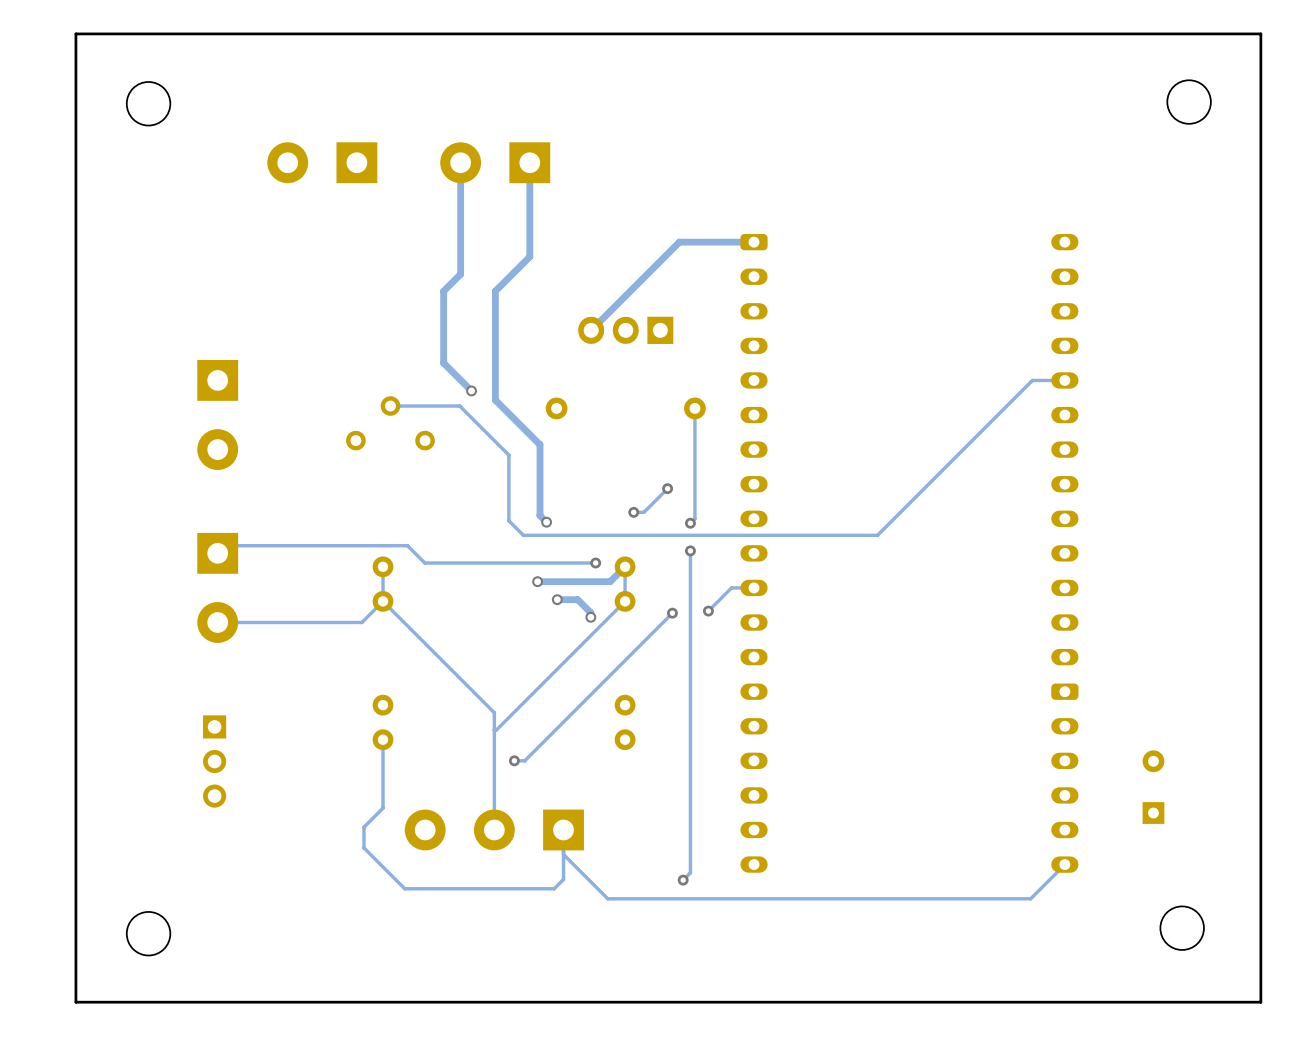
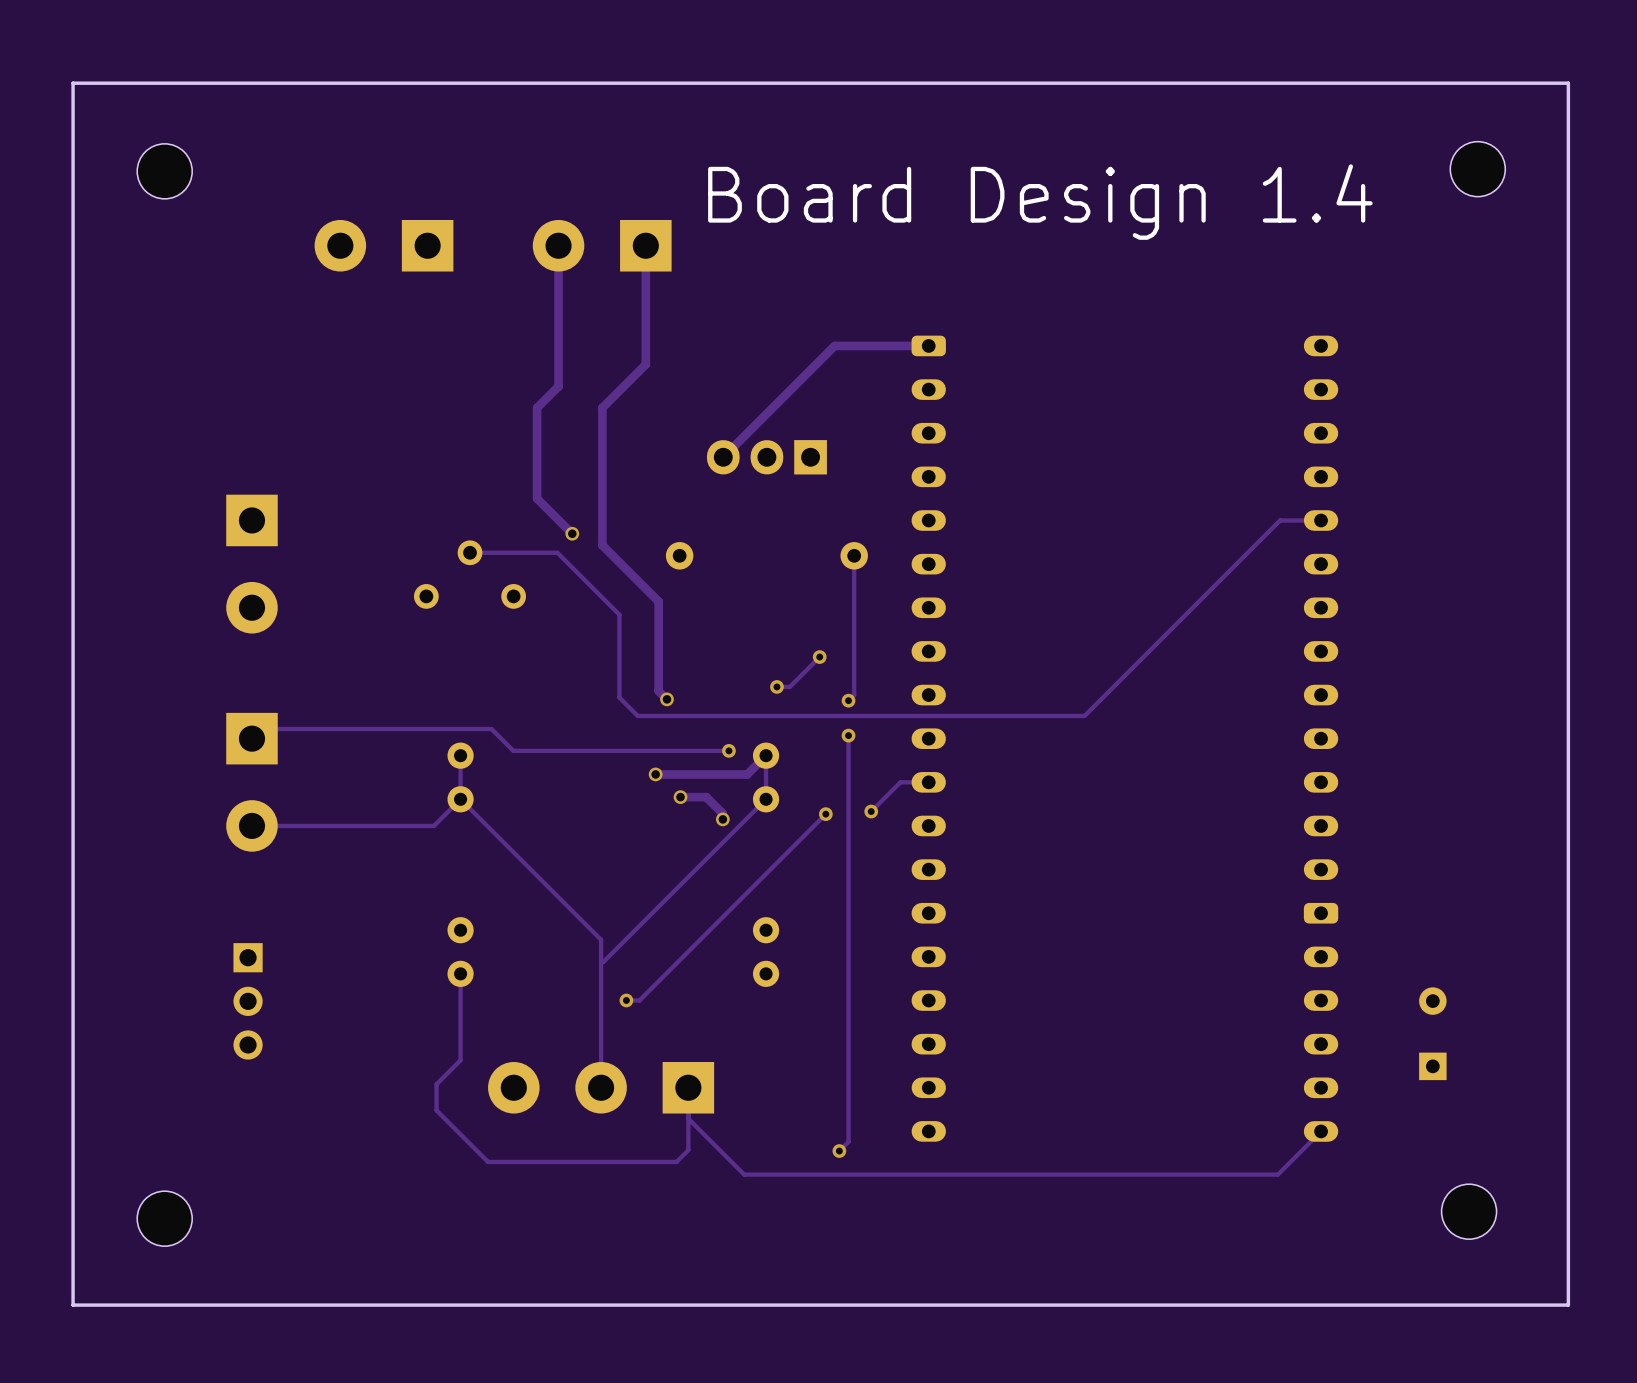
text: none -> Board Design 1.4 (1040, 202)

